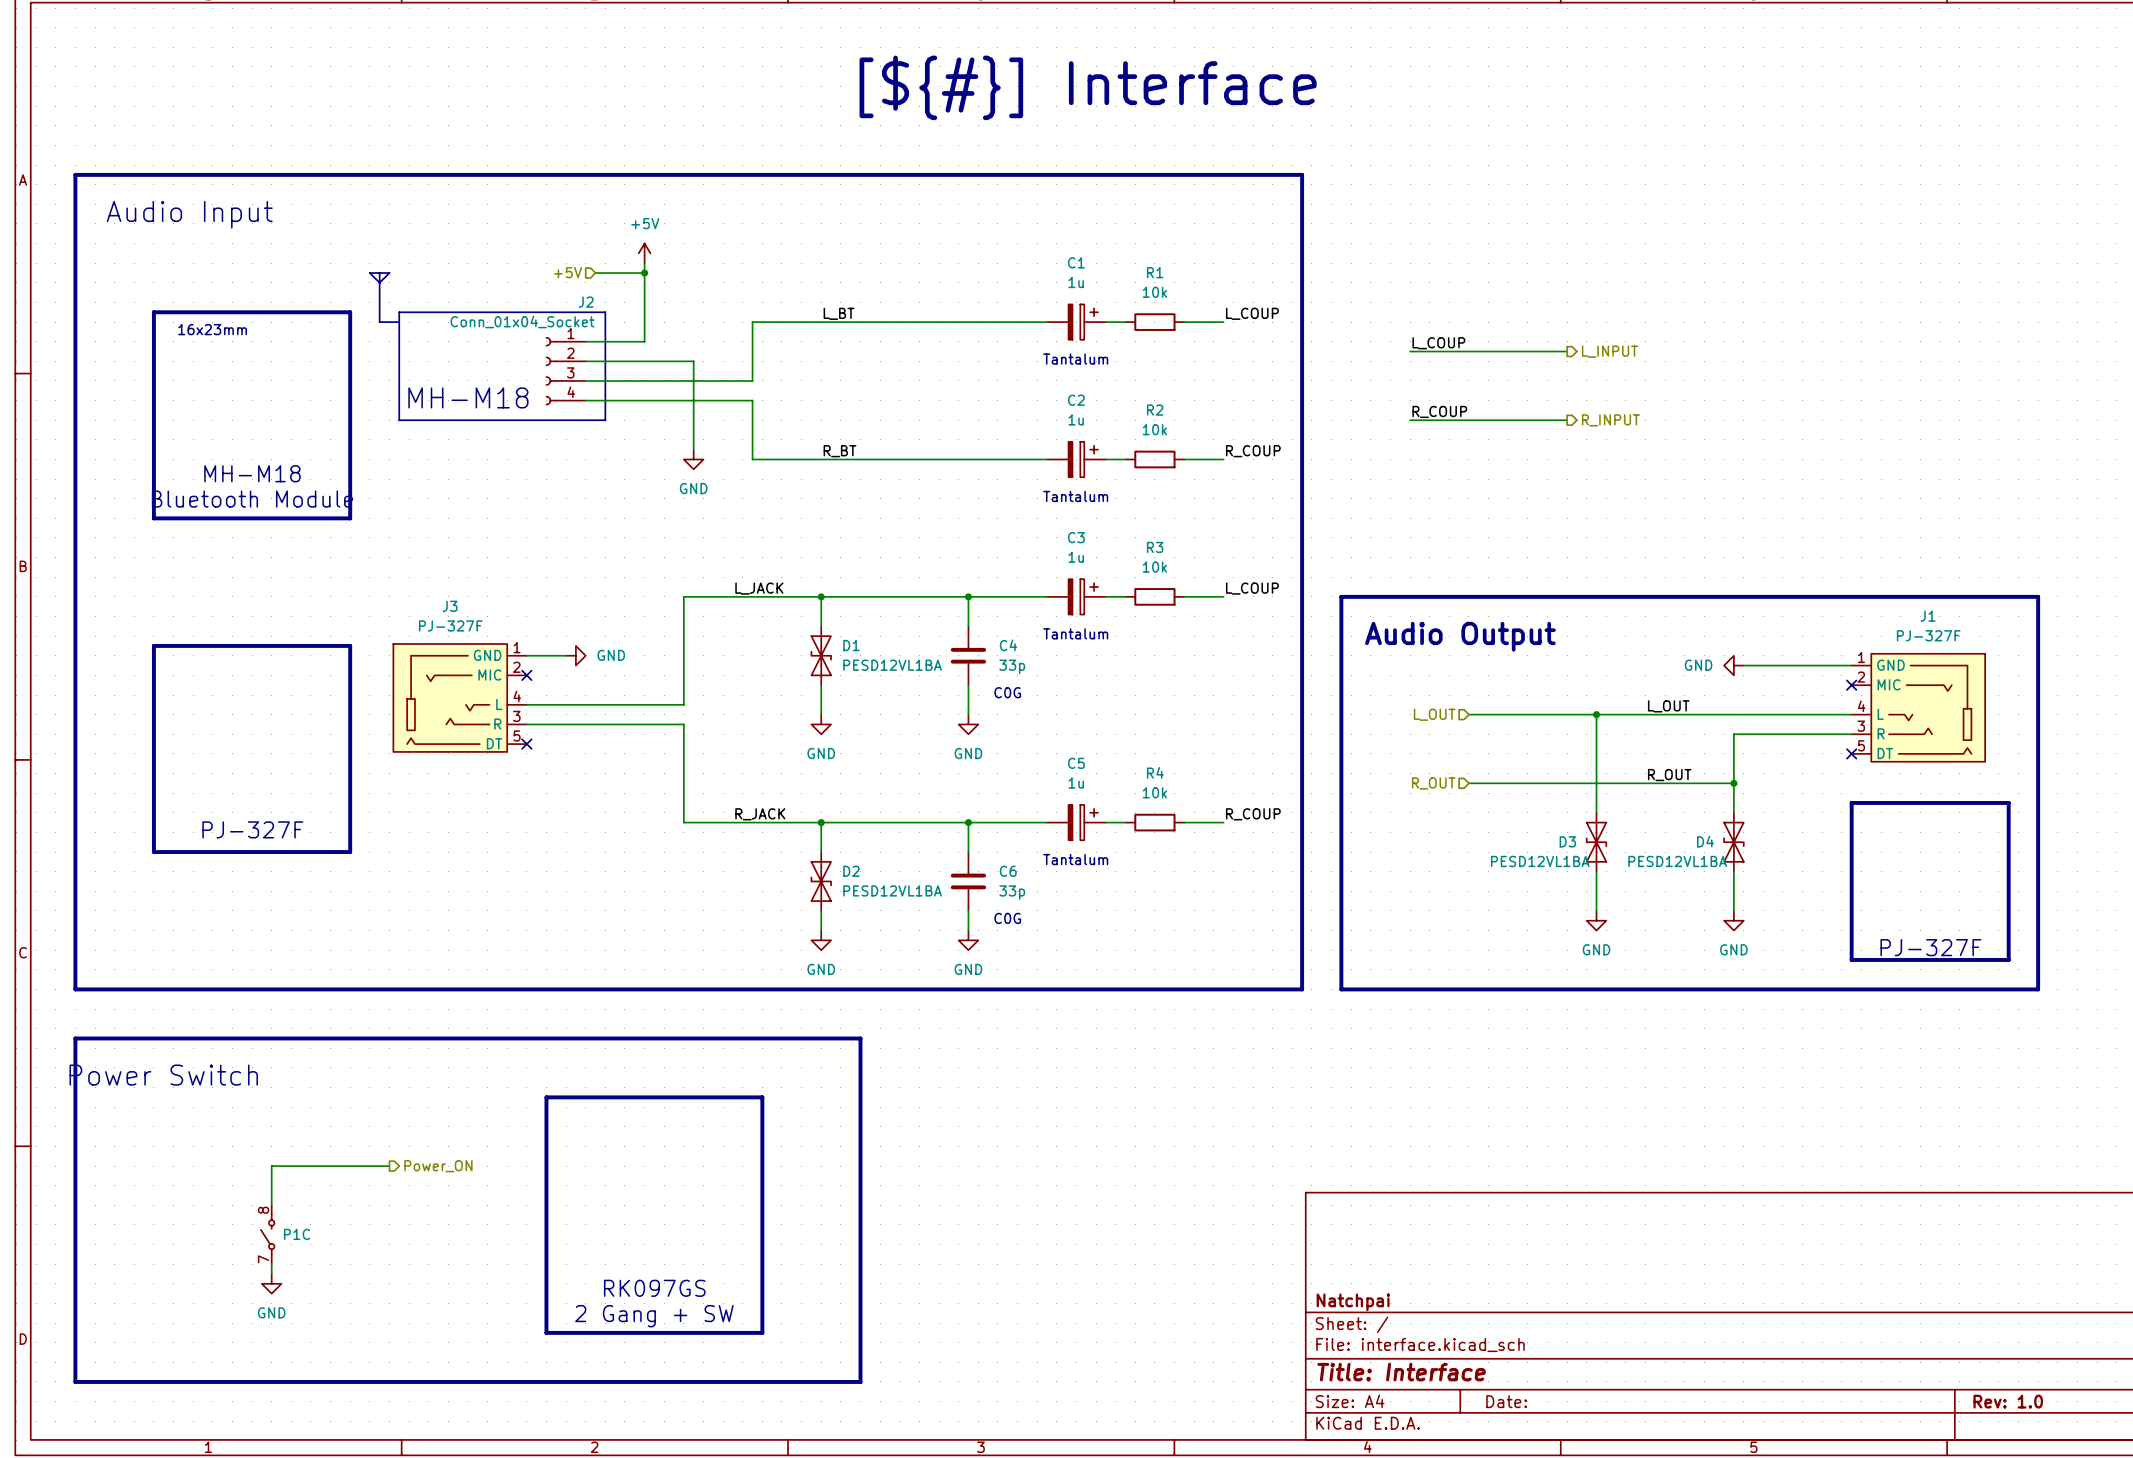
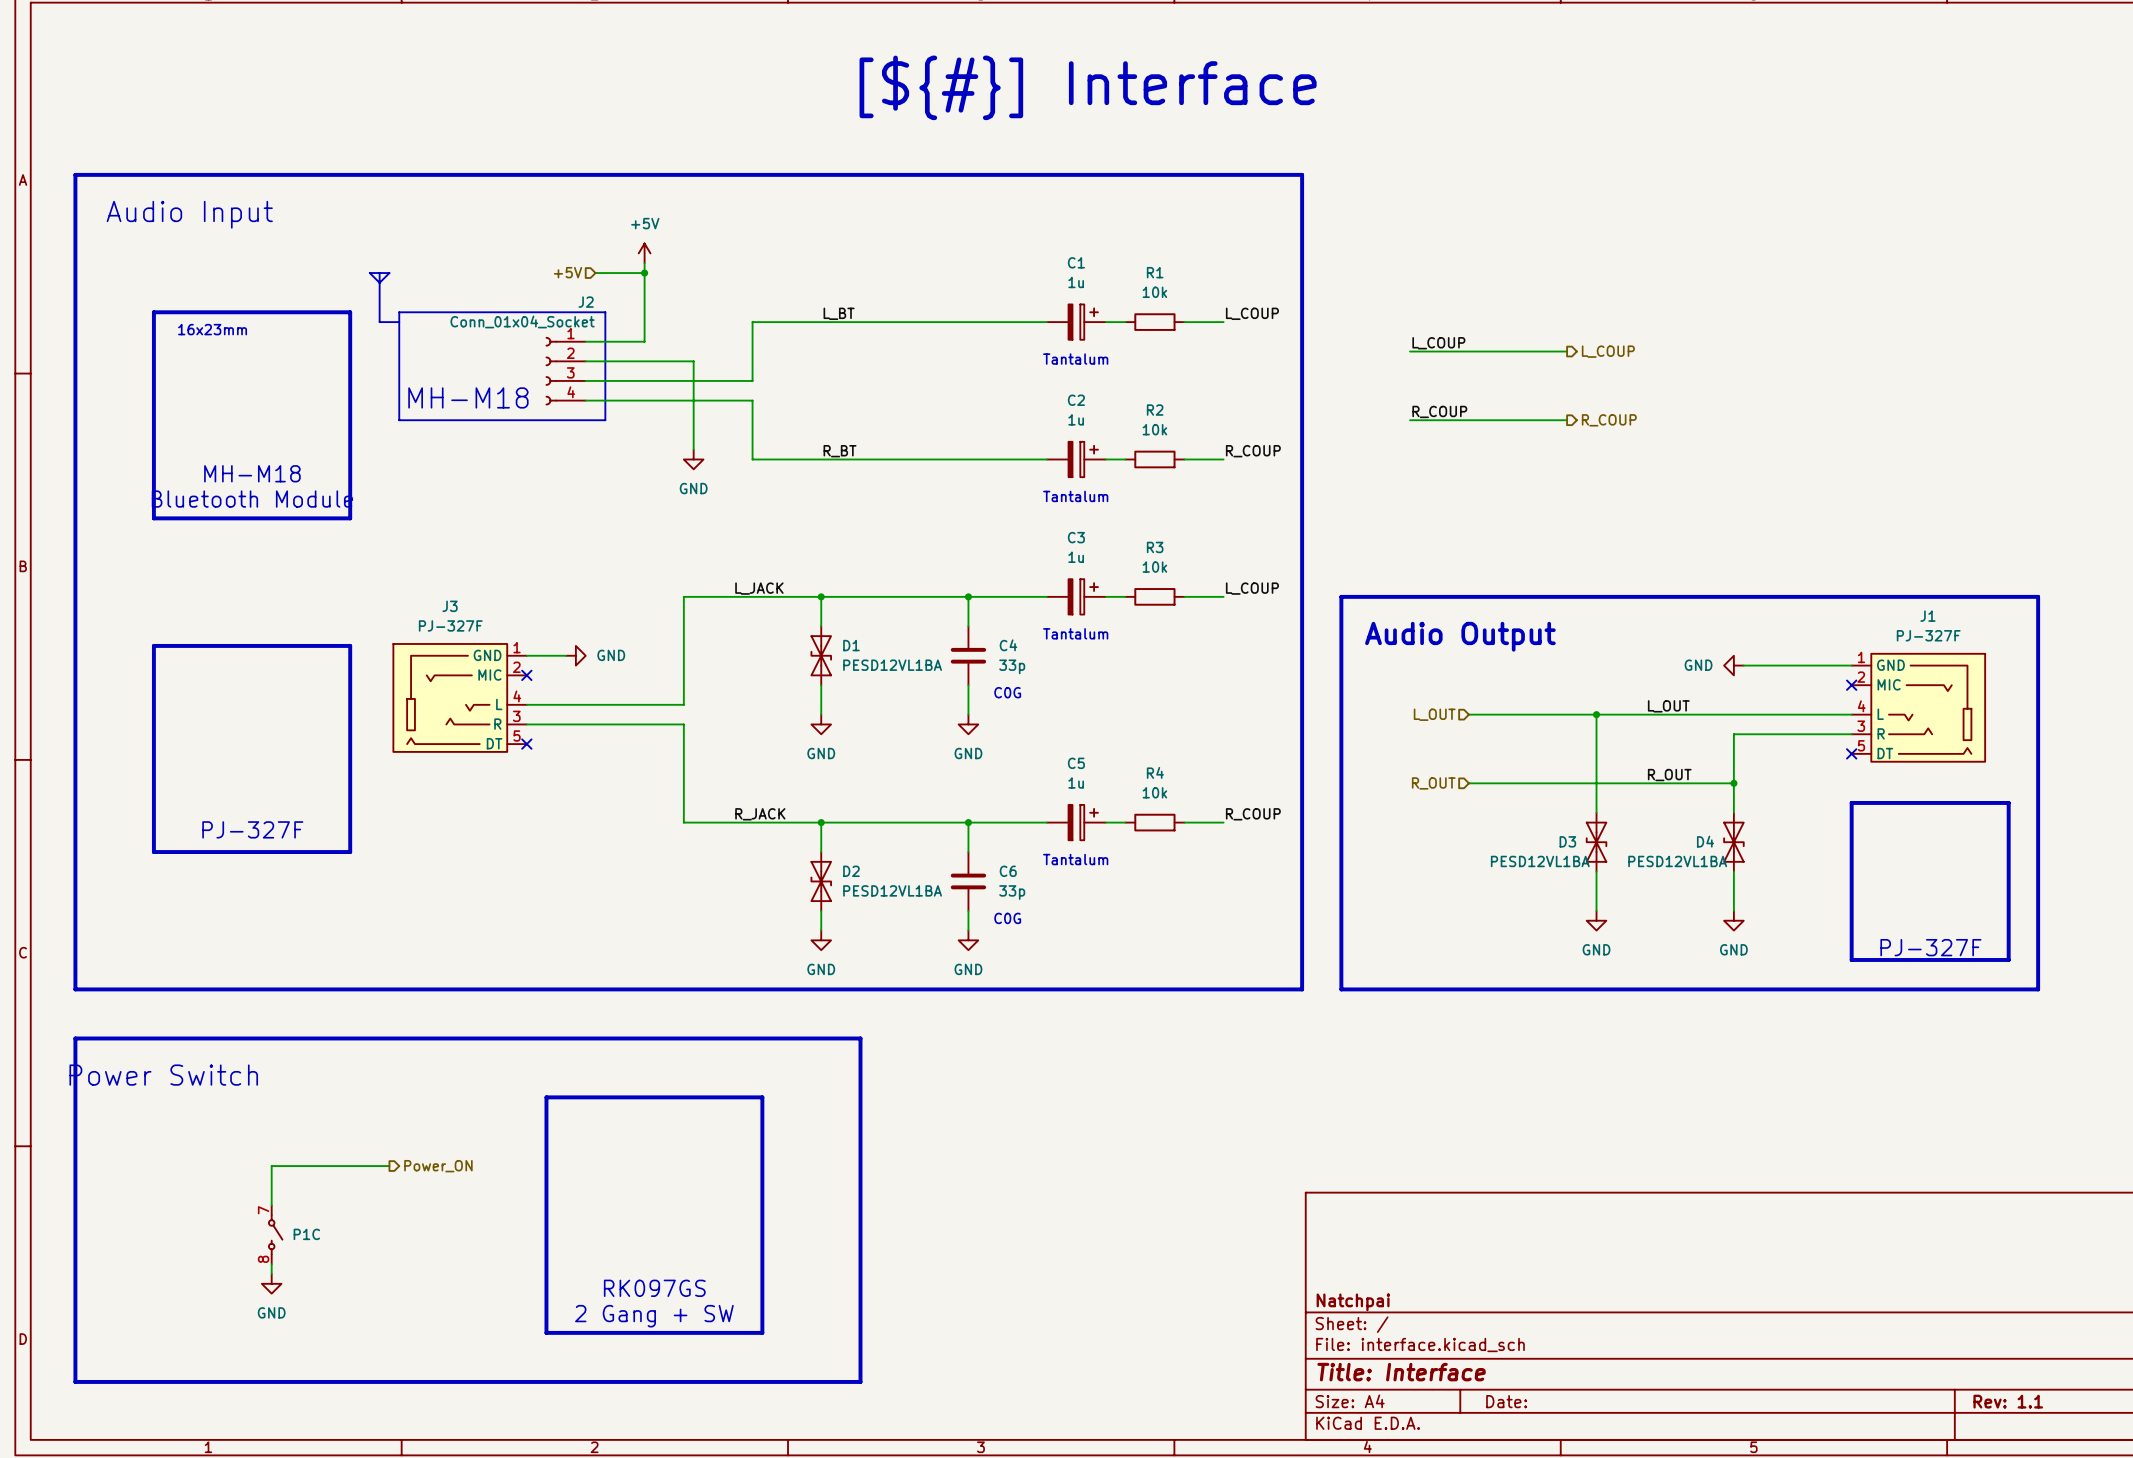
hierarchical label: L_INPUT (1609, 351) -> L_COUP (1608, 351)
hierarchical label: R_INPUT (1610, 420) -> R_COUP (1609, 420)
P1C rotation: 0° (267, 1234) -> 180° (275, 1234)
title block: Rev: 1.0 (2008, 1401) -> Rev: 1.1 (2008, 1401)

